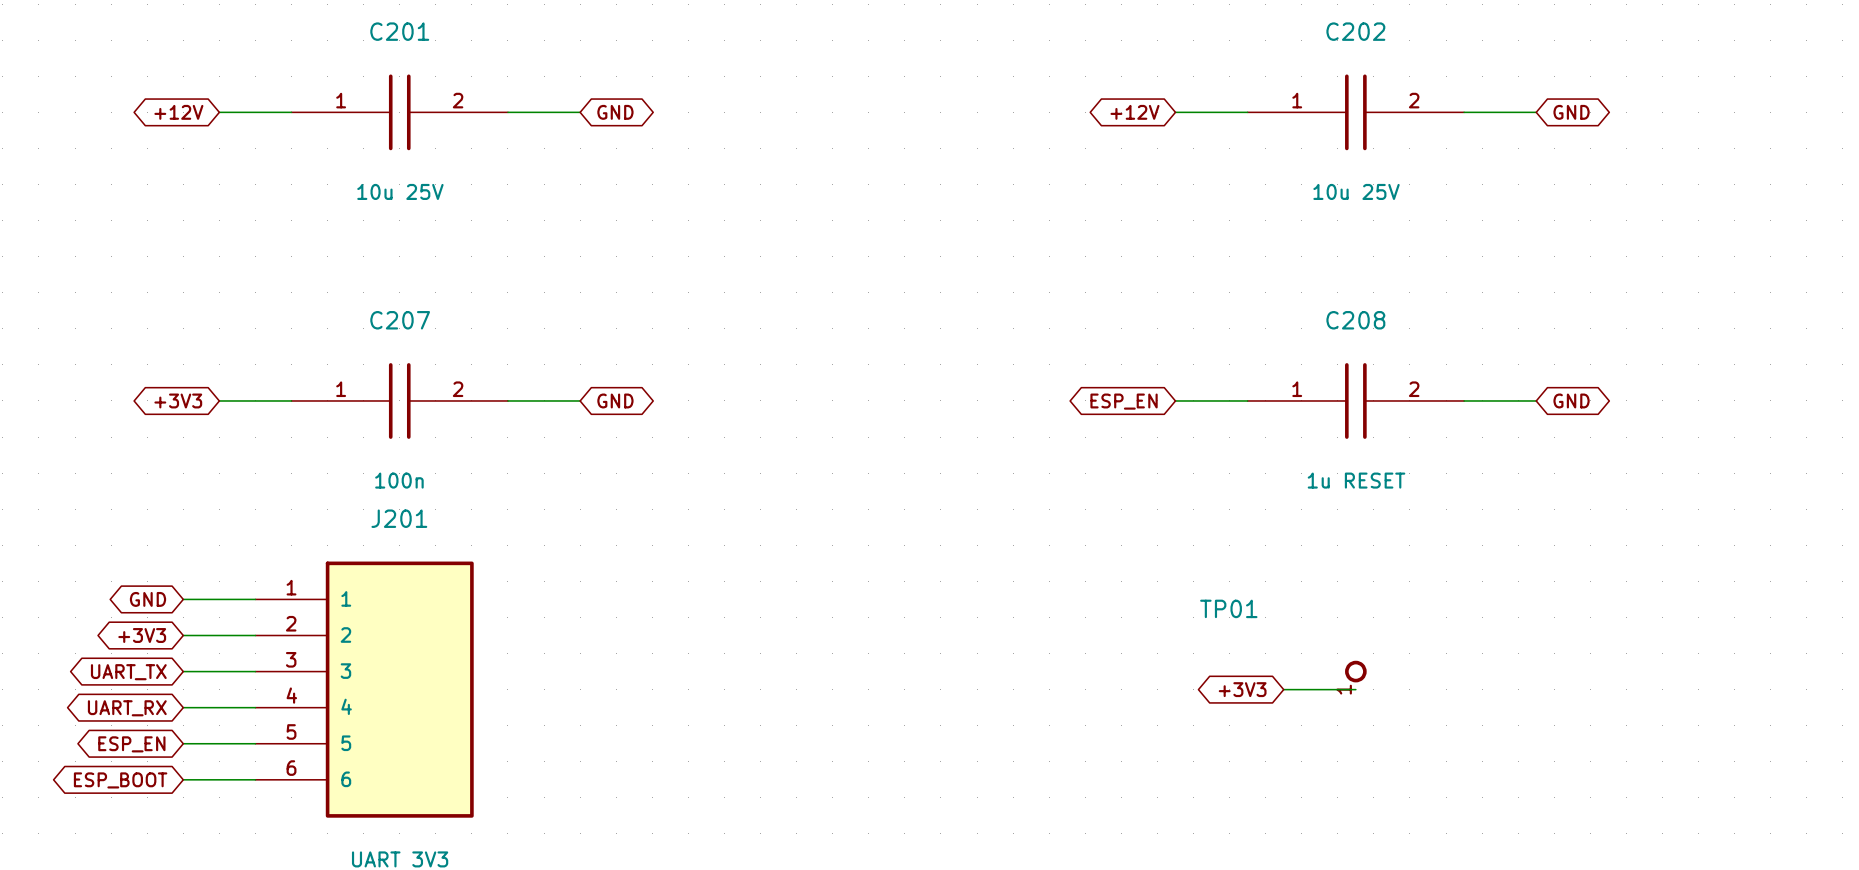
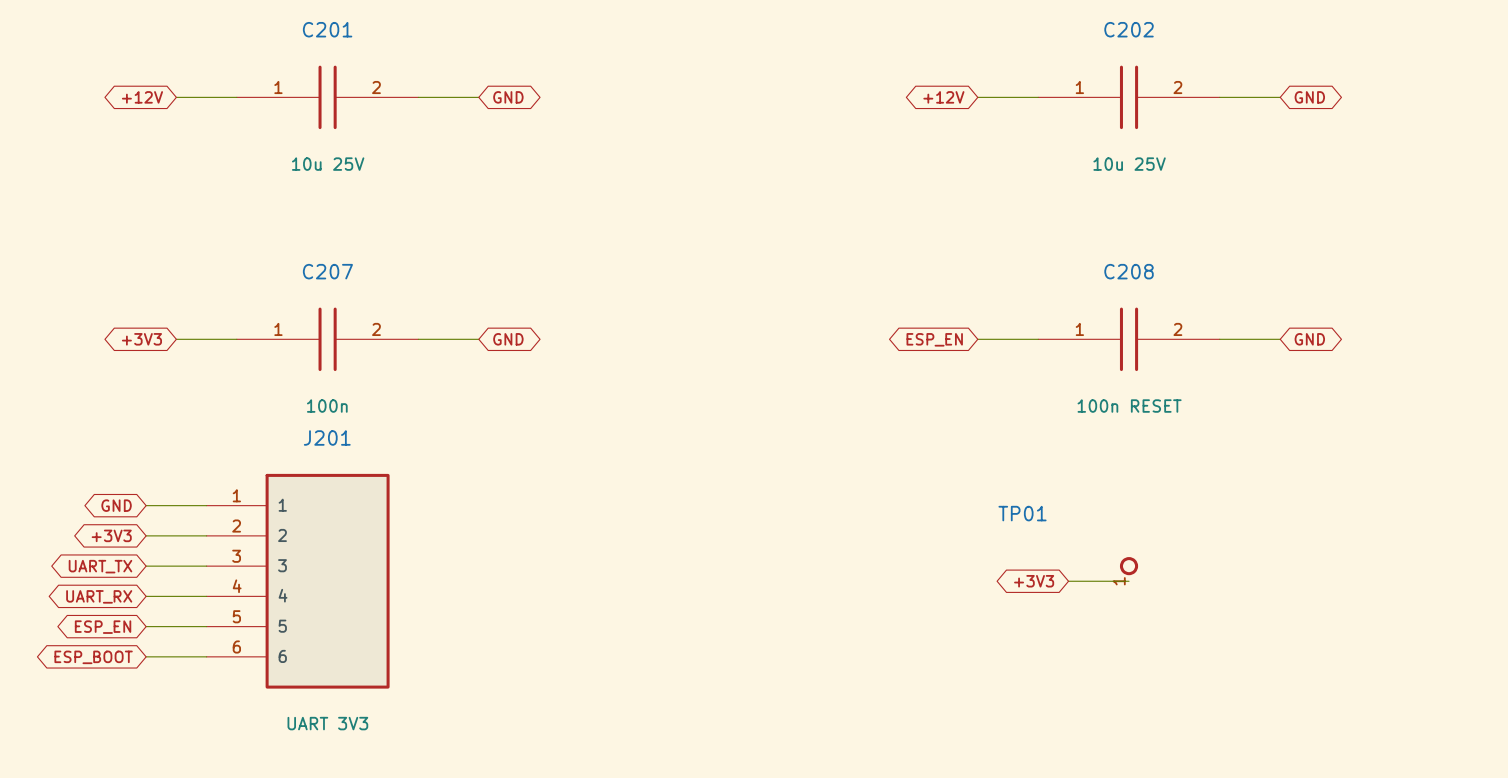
C208 value: 1u RESET (1356, 480) -> 100n RESET (1129, 406)

